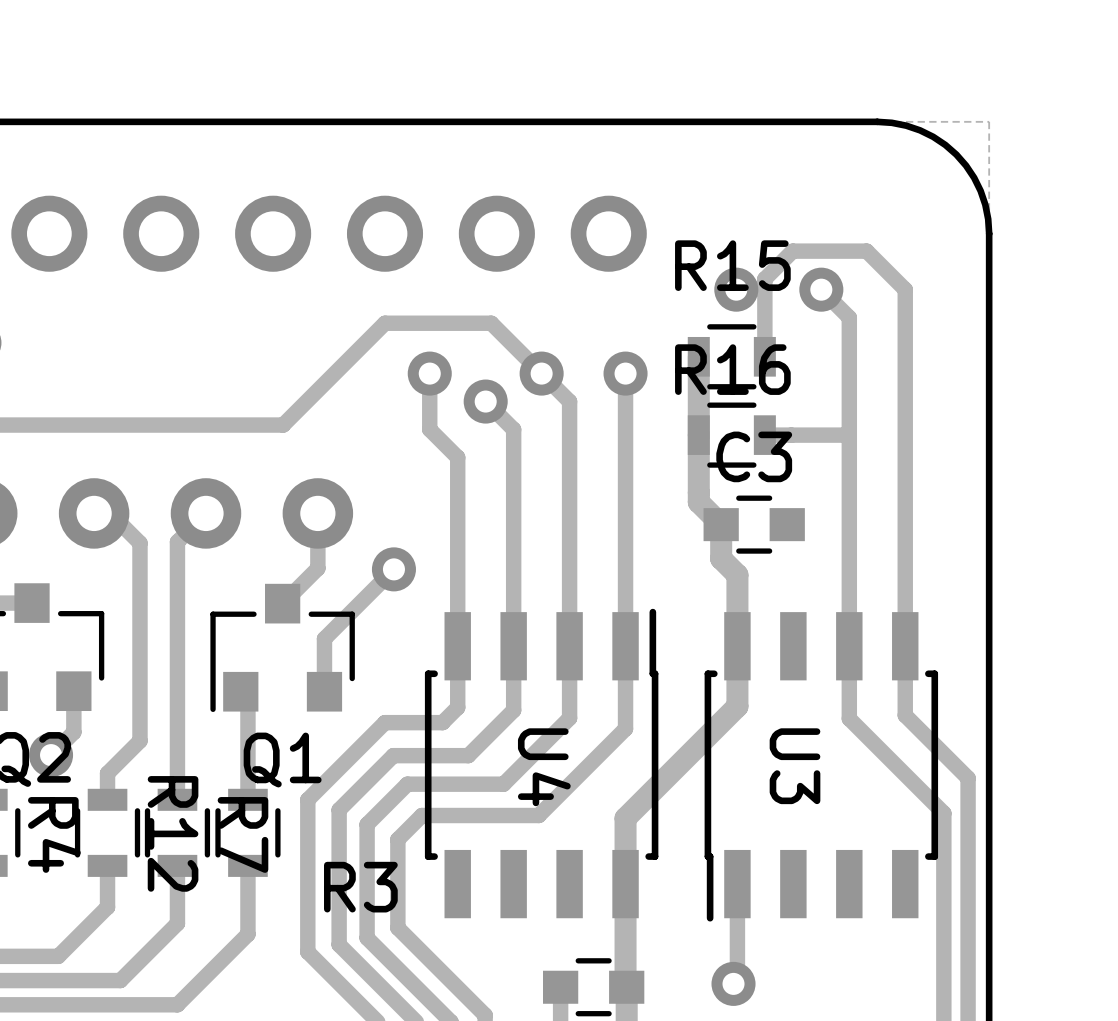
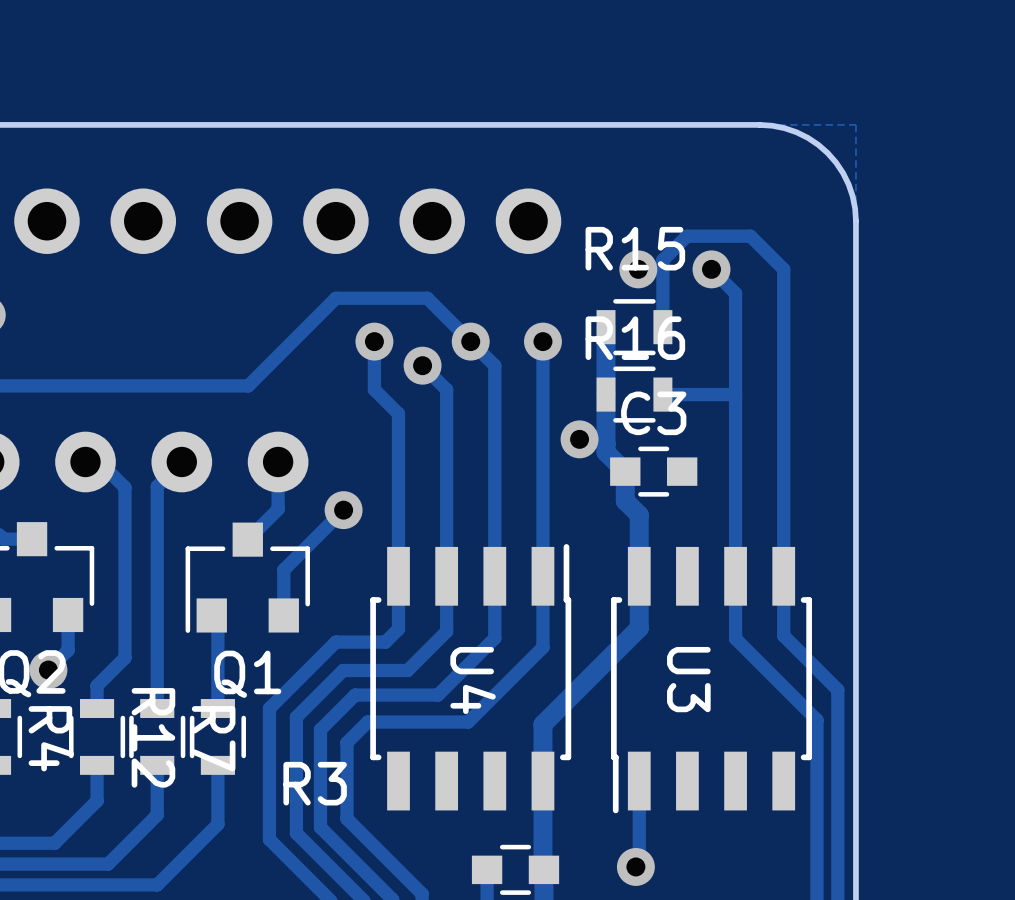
via: none -> (579, 439)

